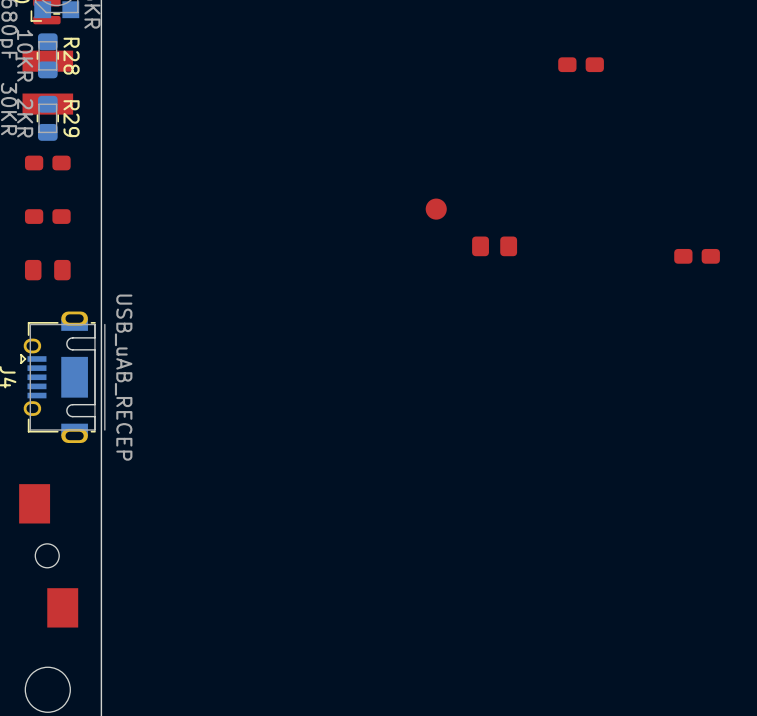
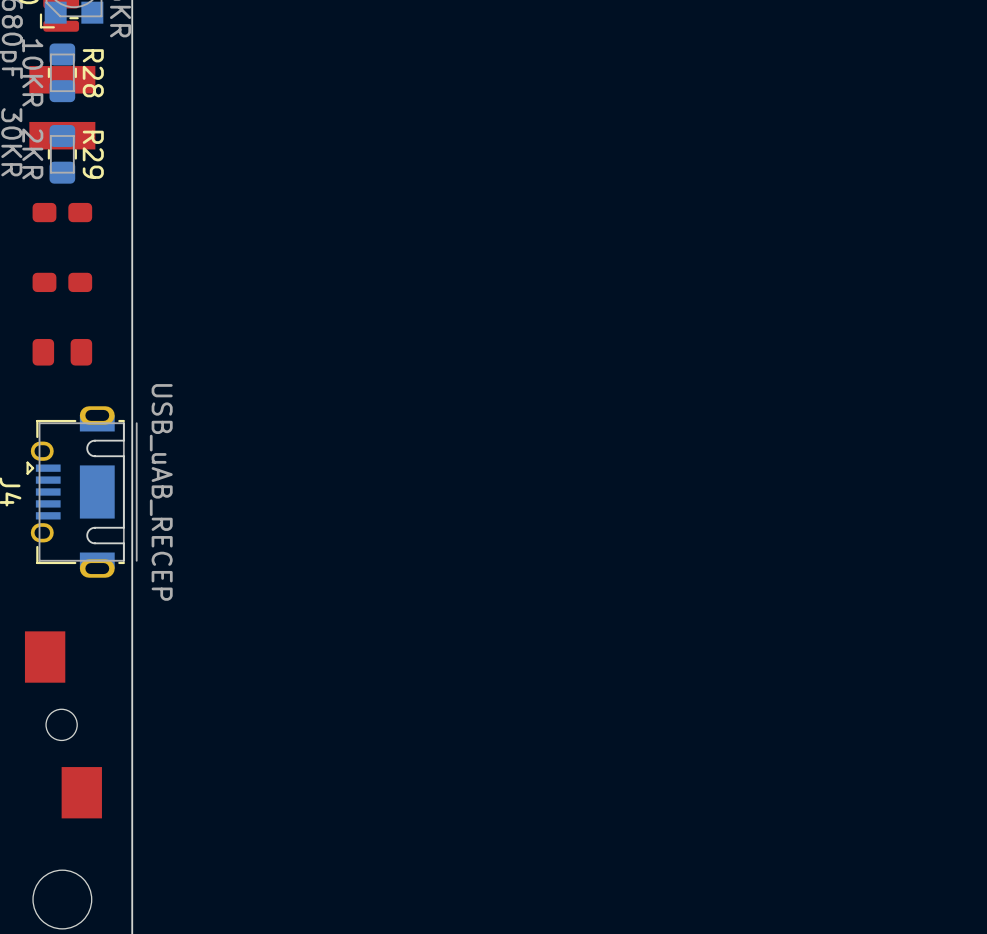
part: (581, 64) -> none
part: (436, 209) -> none
part: (494, 246) -> none
part: (697, 256) -> none

